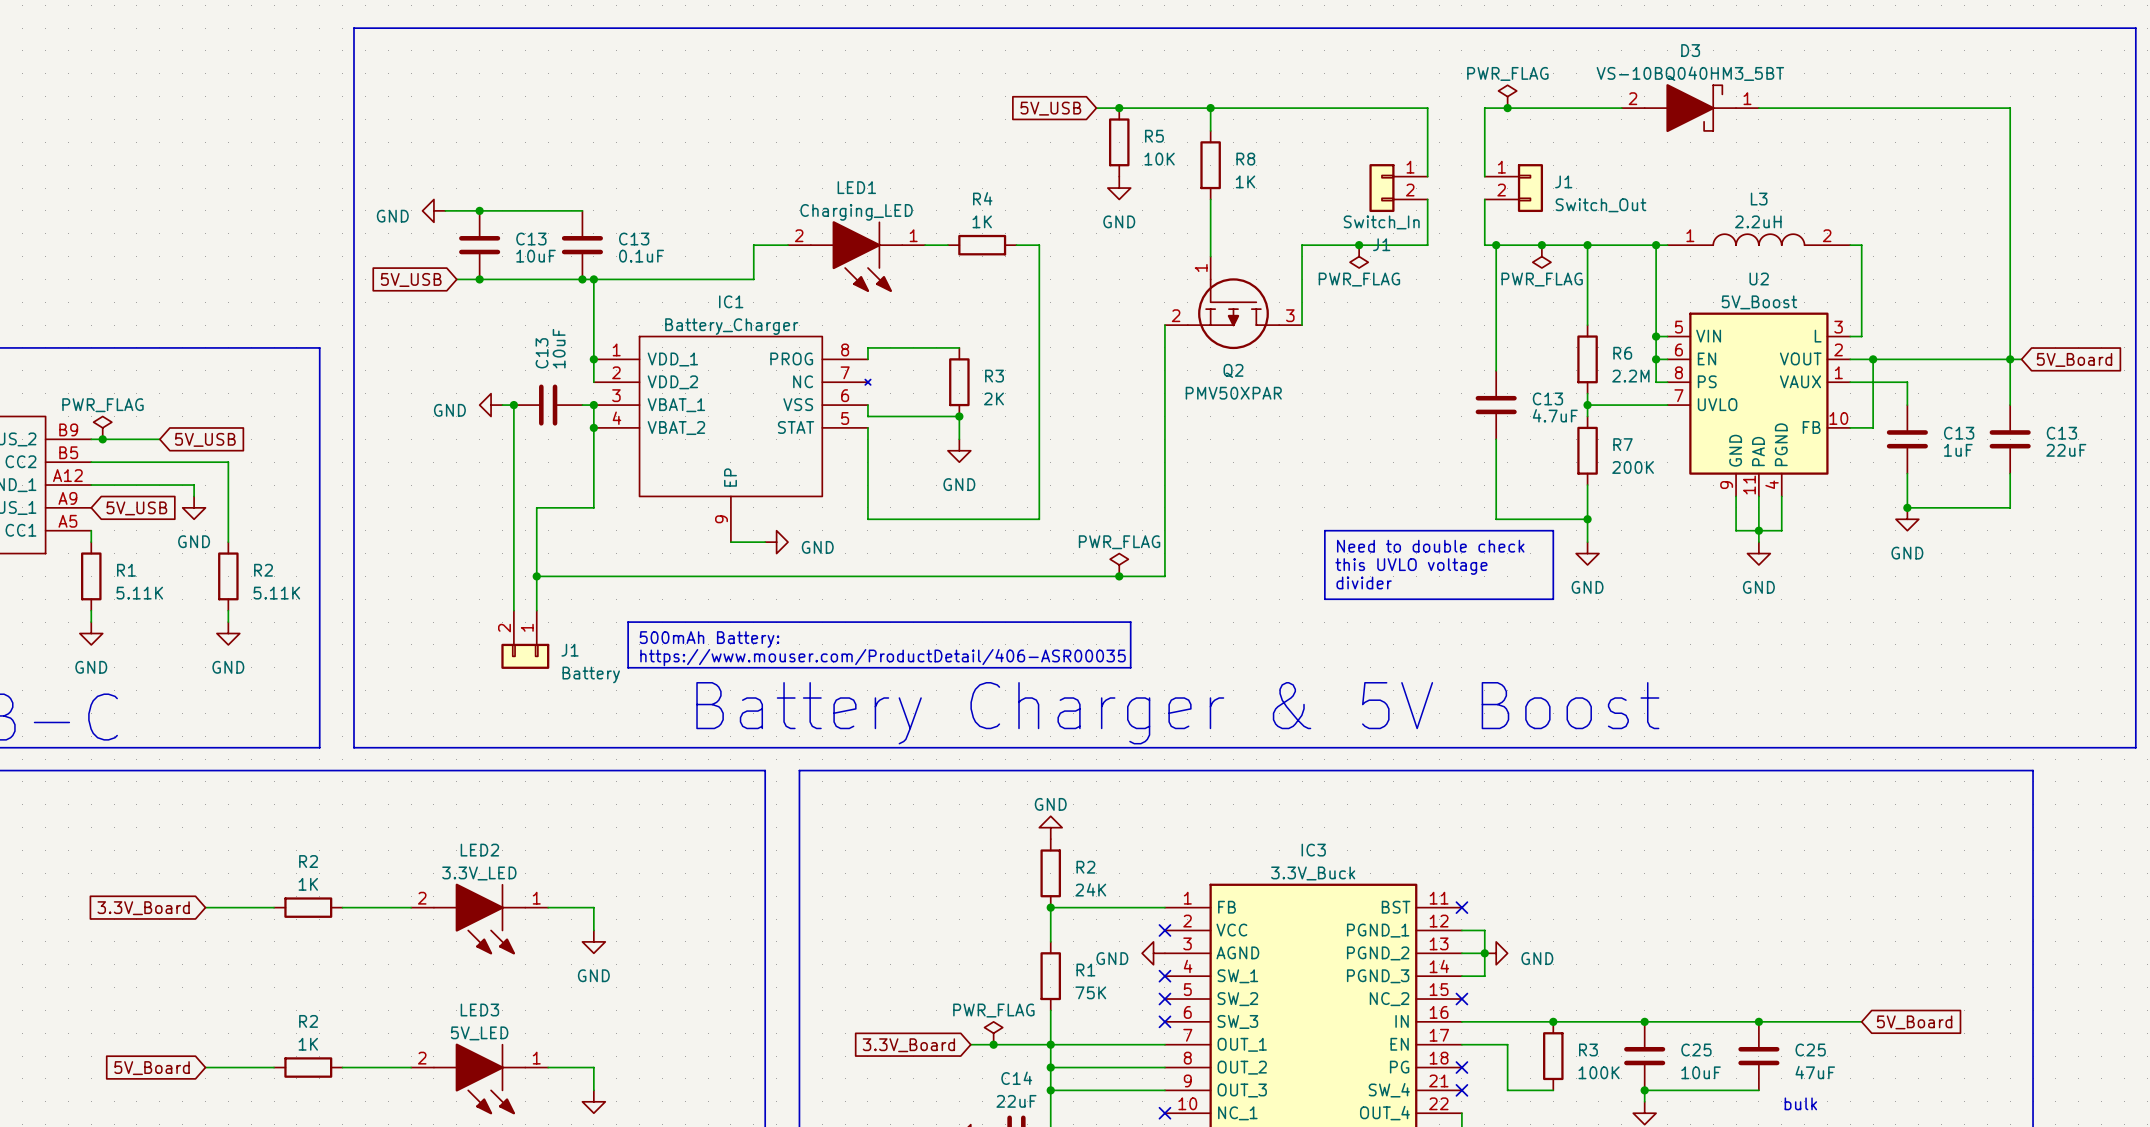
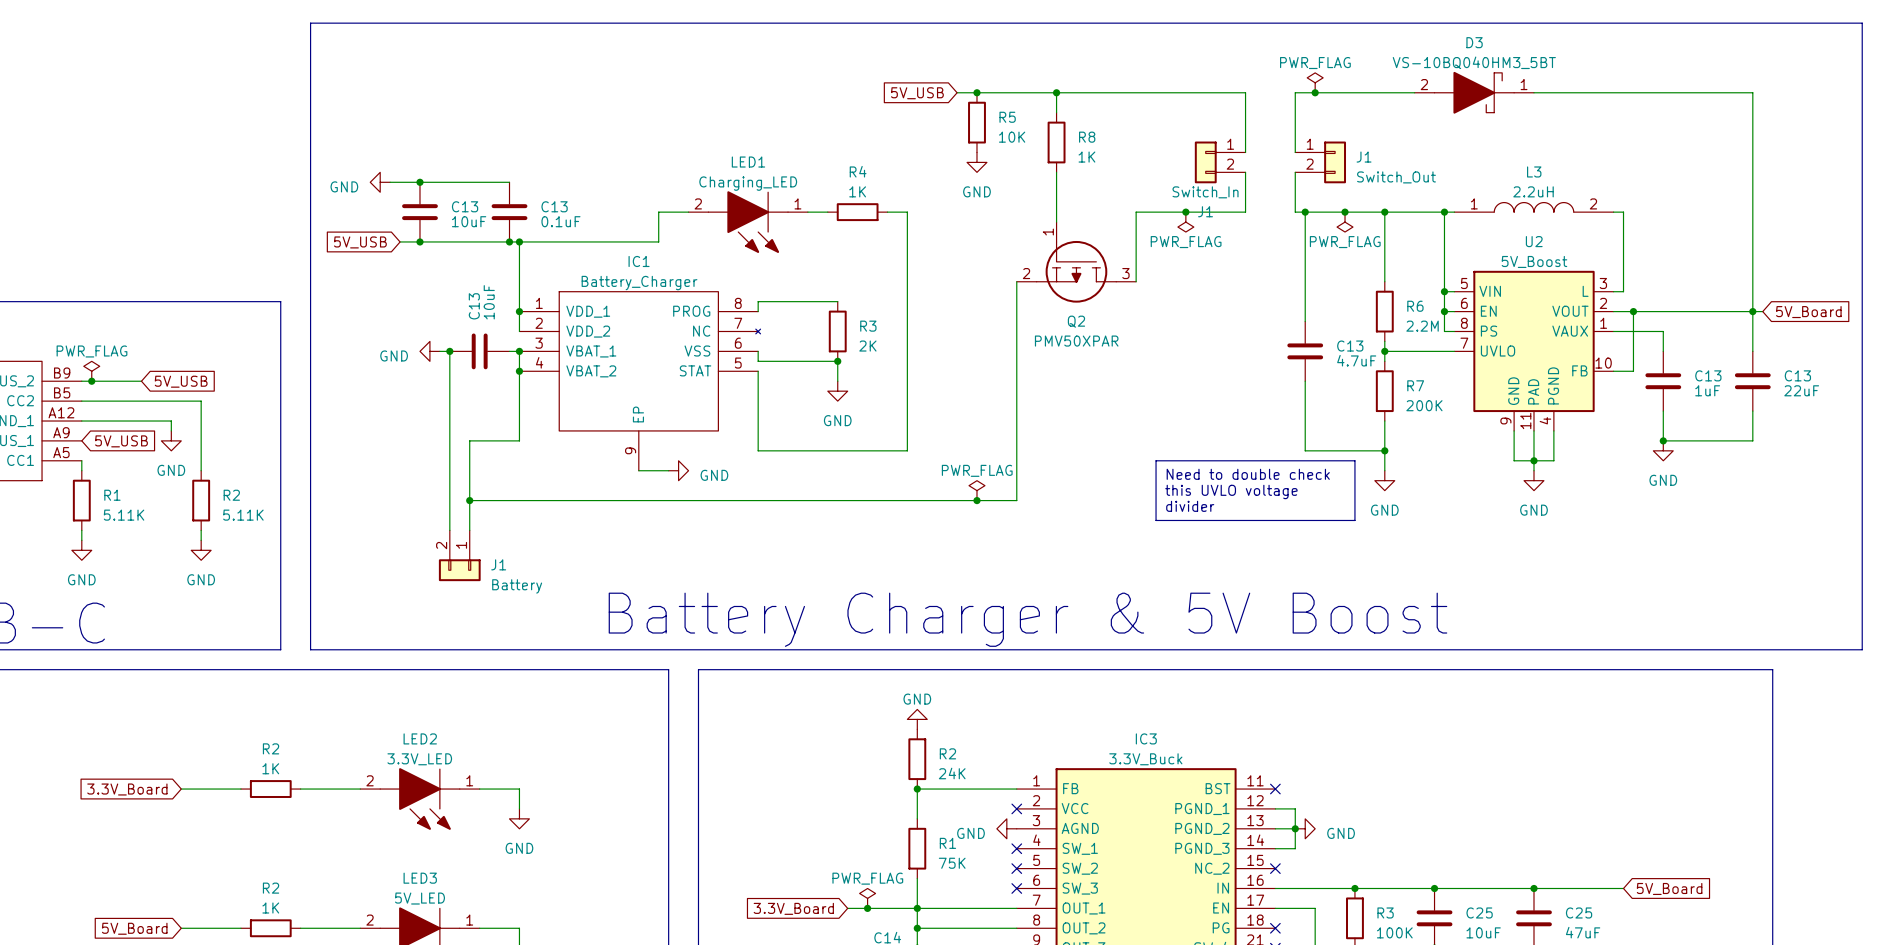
line: (628, 622) (1130, 622) (1130, 667) (628, 667) (628, 622) -> none
text: 500mAh Battery: (709, 639) -> none
text: https://www.mouser.com/ProductDetail/406-ASR00035 (883, 657) -> none

